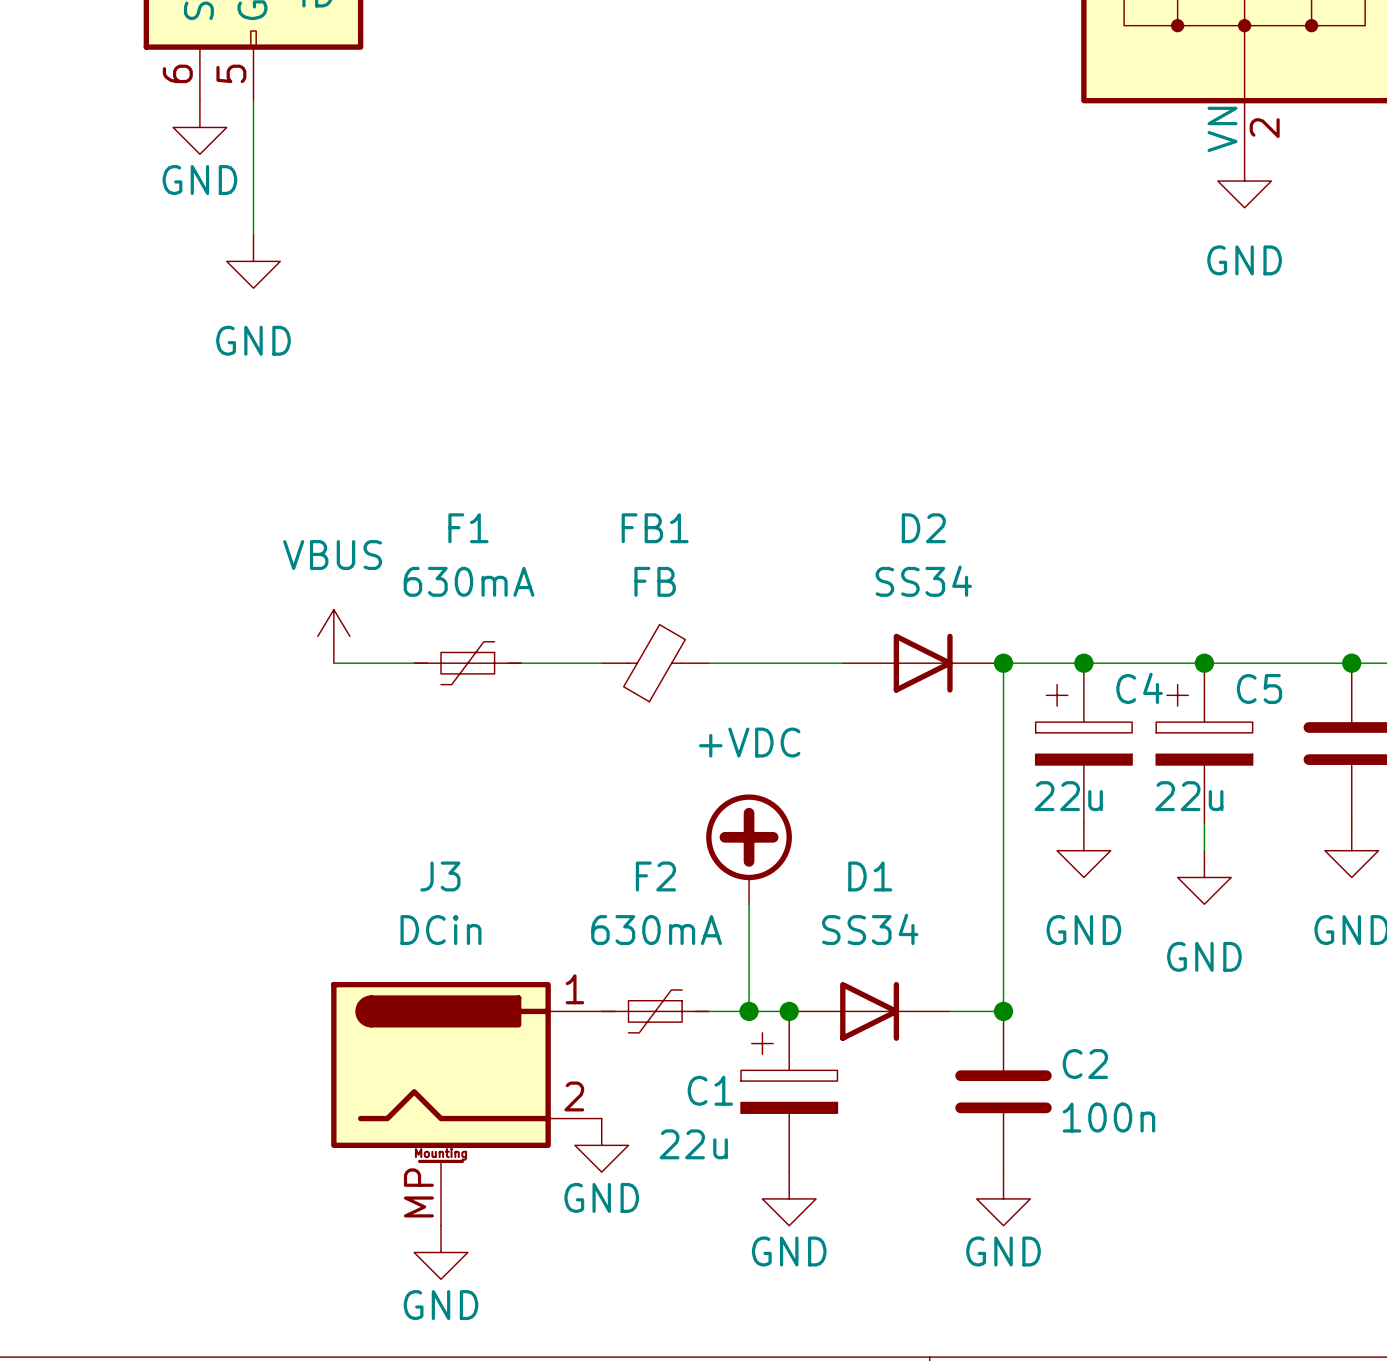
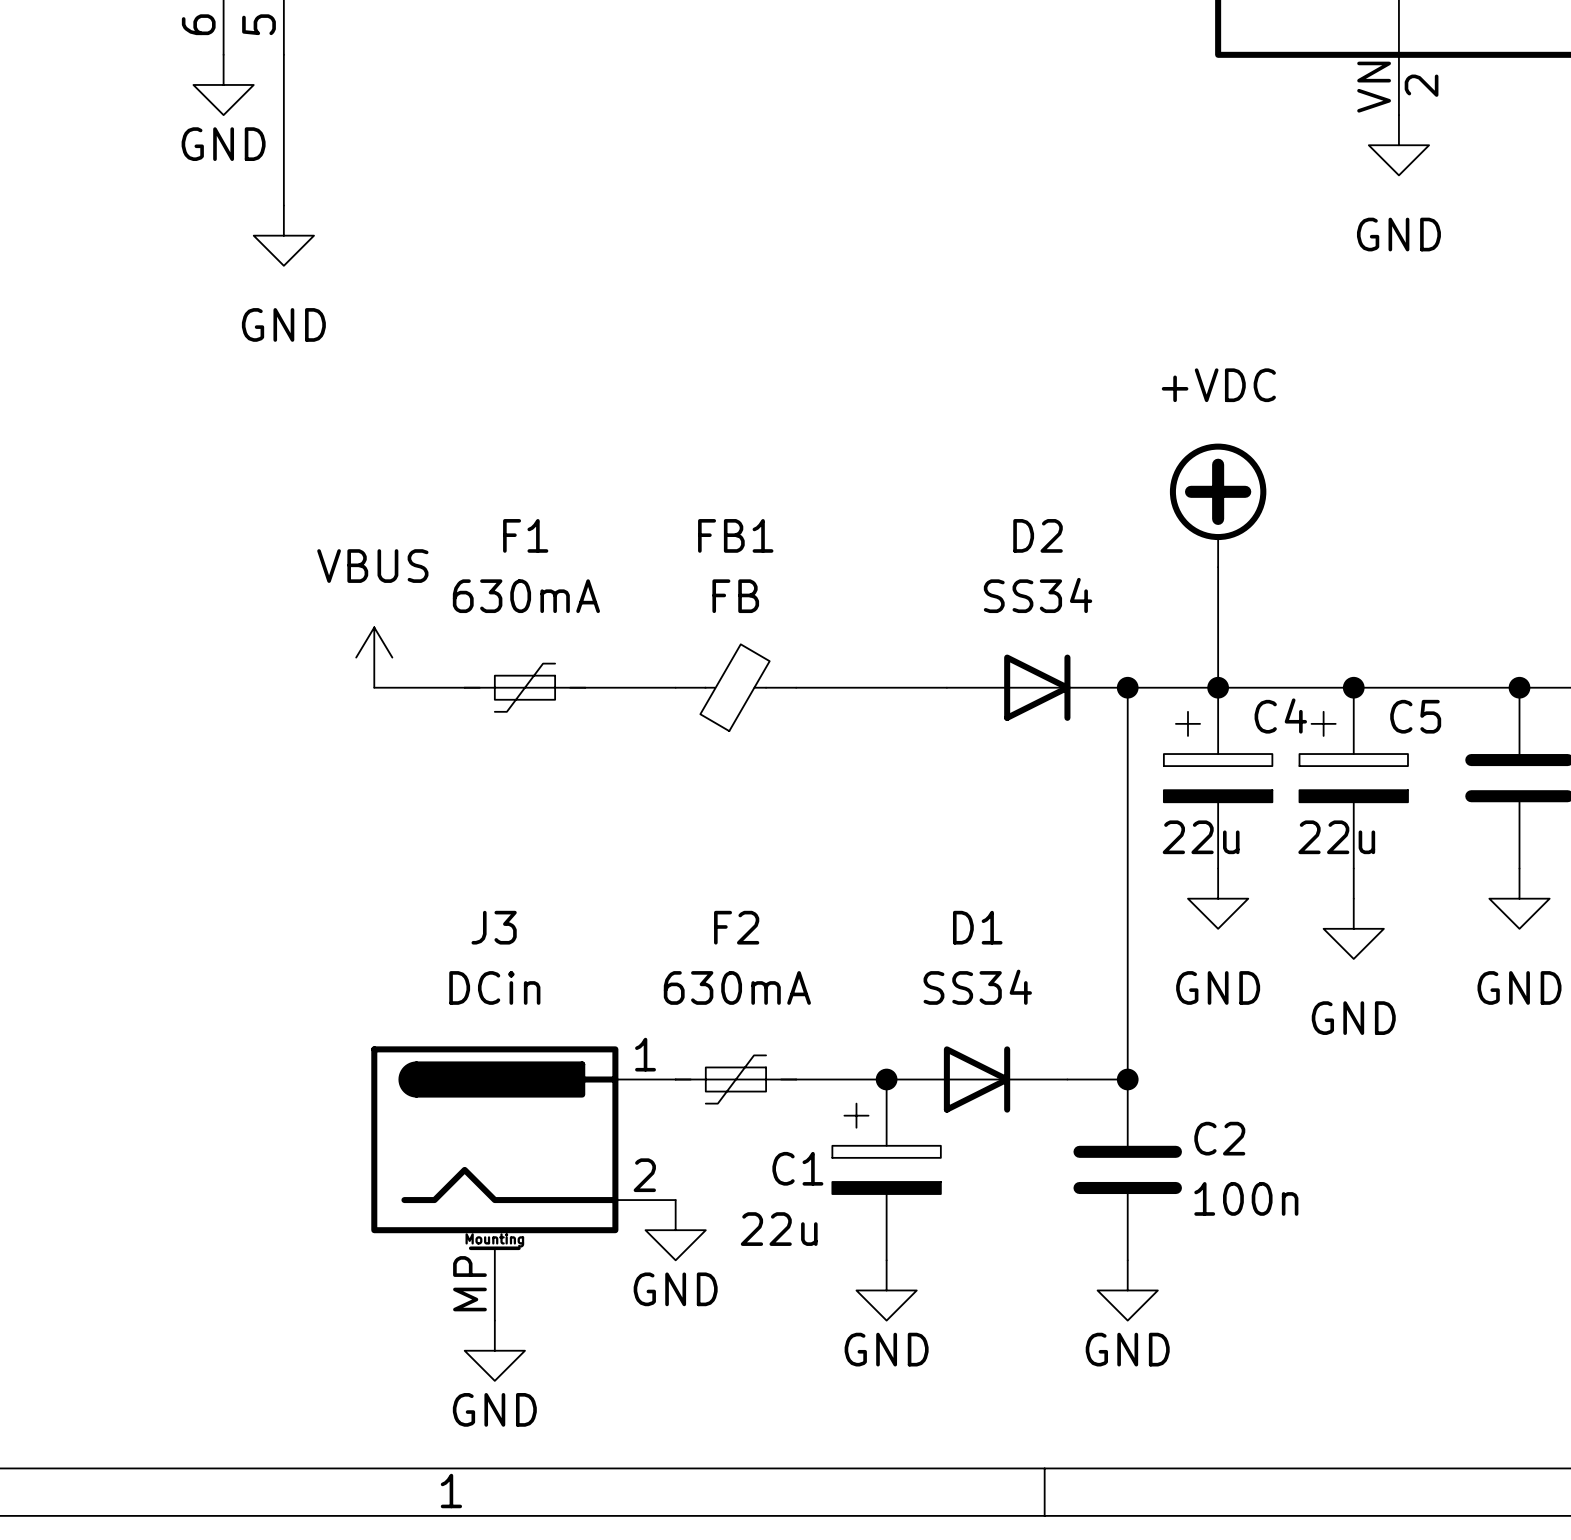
power symbol position: +VDC (749, 849) -> +VDC (1218, 505)
wire: (749, 904) (749, 1011) -> (1218, 567) (1218, 687)
junction: (749, 1011) -> none

